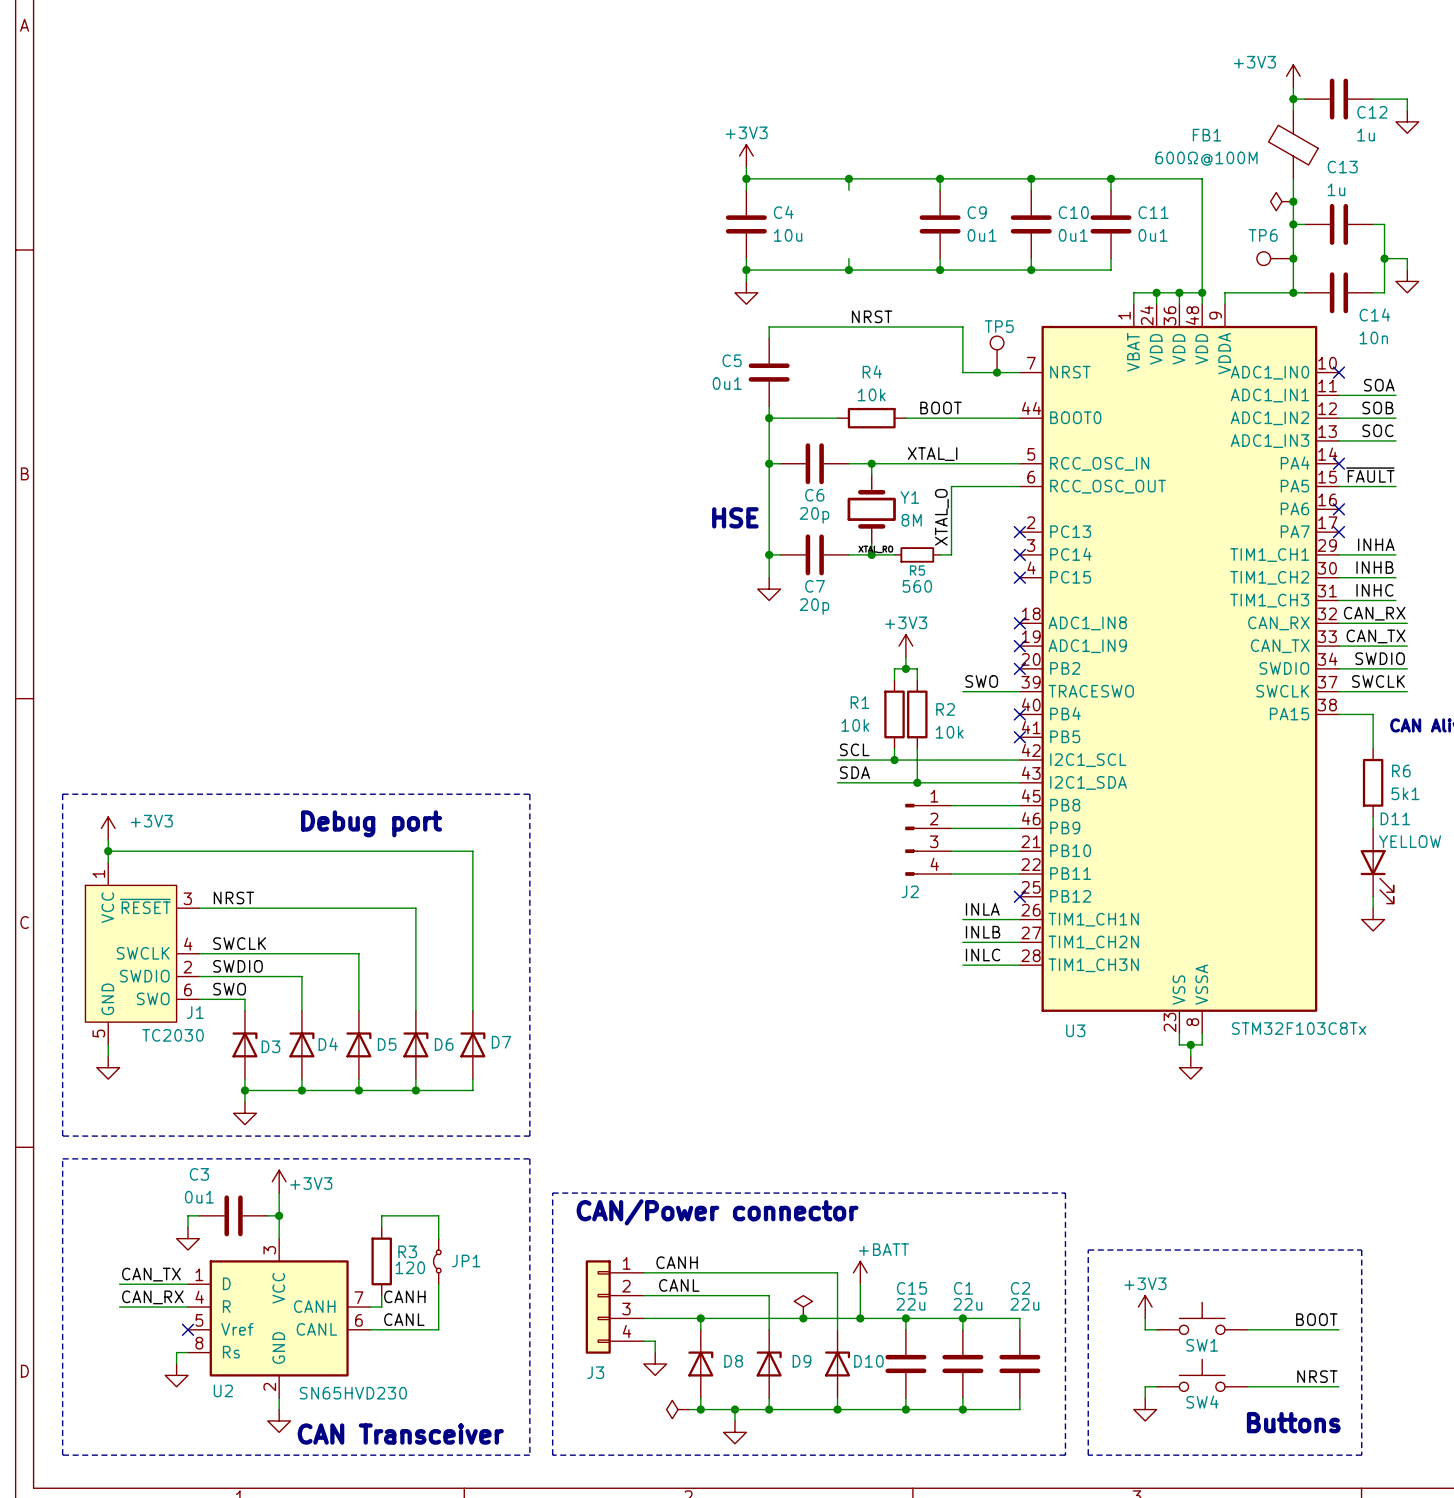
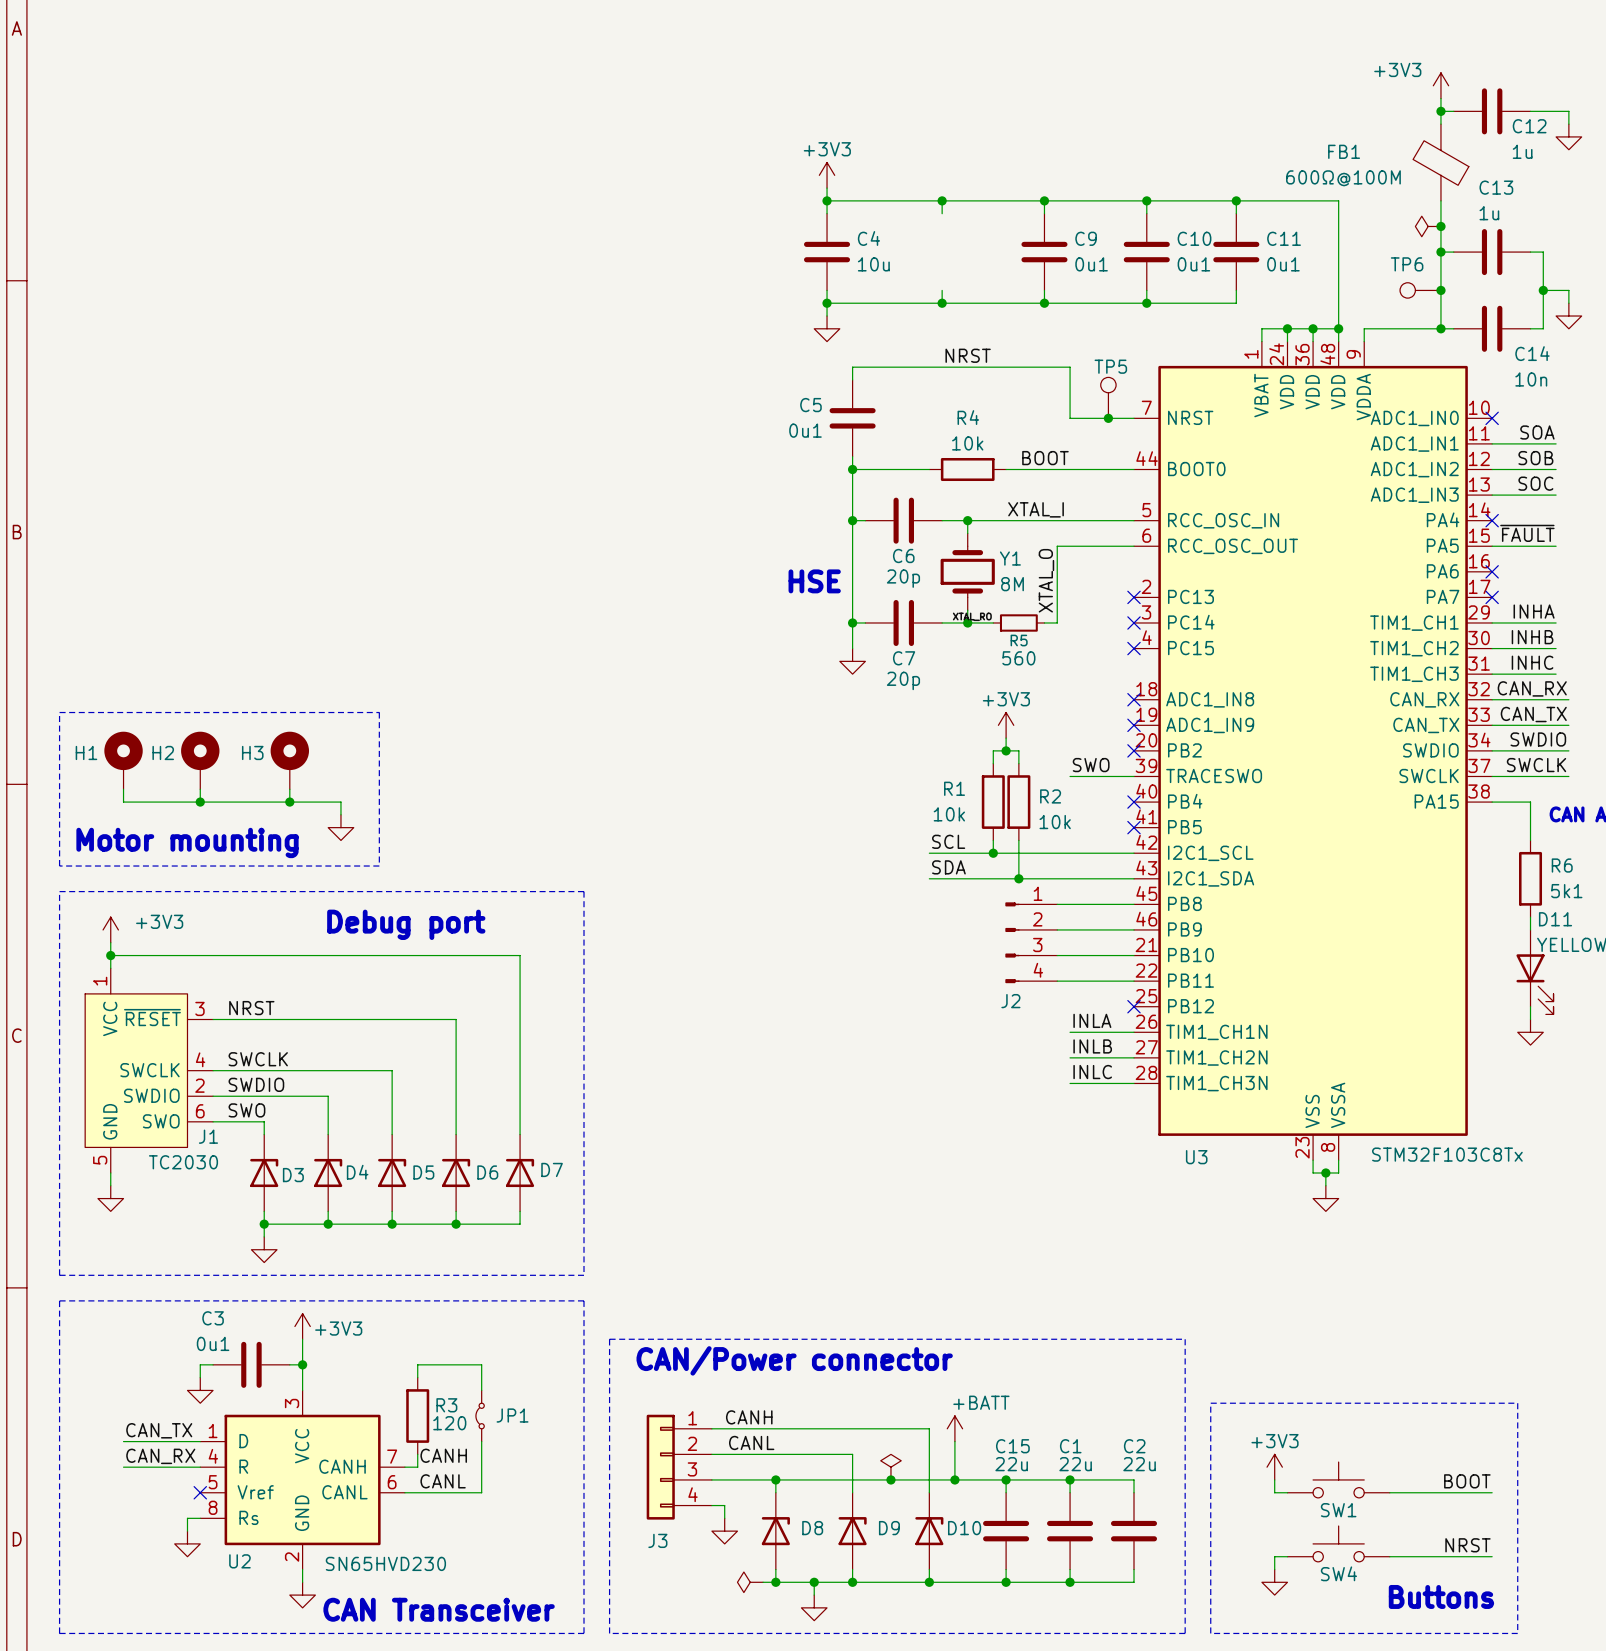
line: none -> (59, 712) (379, 712) (379, 866) (59, 866) (59, 712)
H1: none -> (123, 760)
H2: none -> (200, 760)
H3: none -> (289, 760)
wire: none -> (123, 789) (123, 802) (340, 802) (340, 814)
wire: none -> (200, 789) (200, 802)
wire: none -> (289, 789) (289, 802)
junction: none -> (200, 802)
junction: none -> (289, 802)
power symbol: none -> (340, 827)
text: none -> Motor mounting (187, 842)

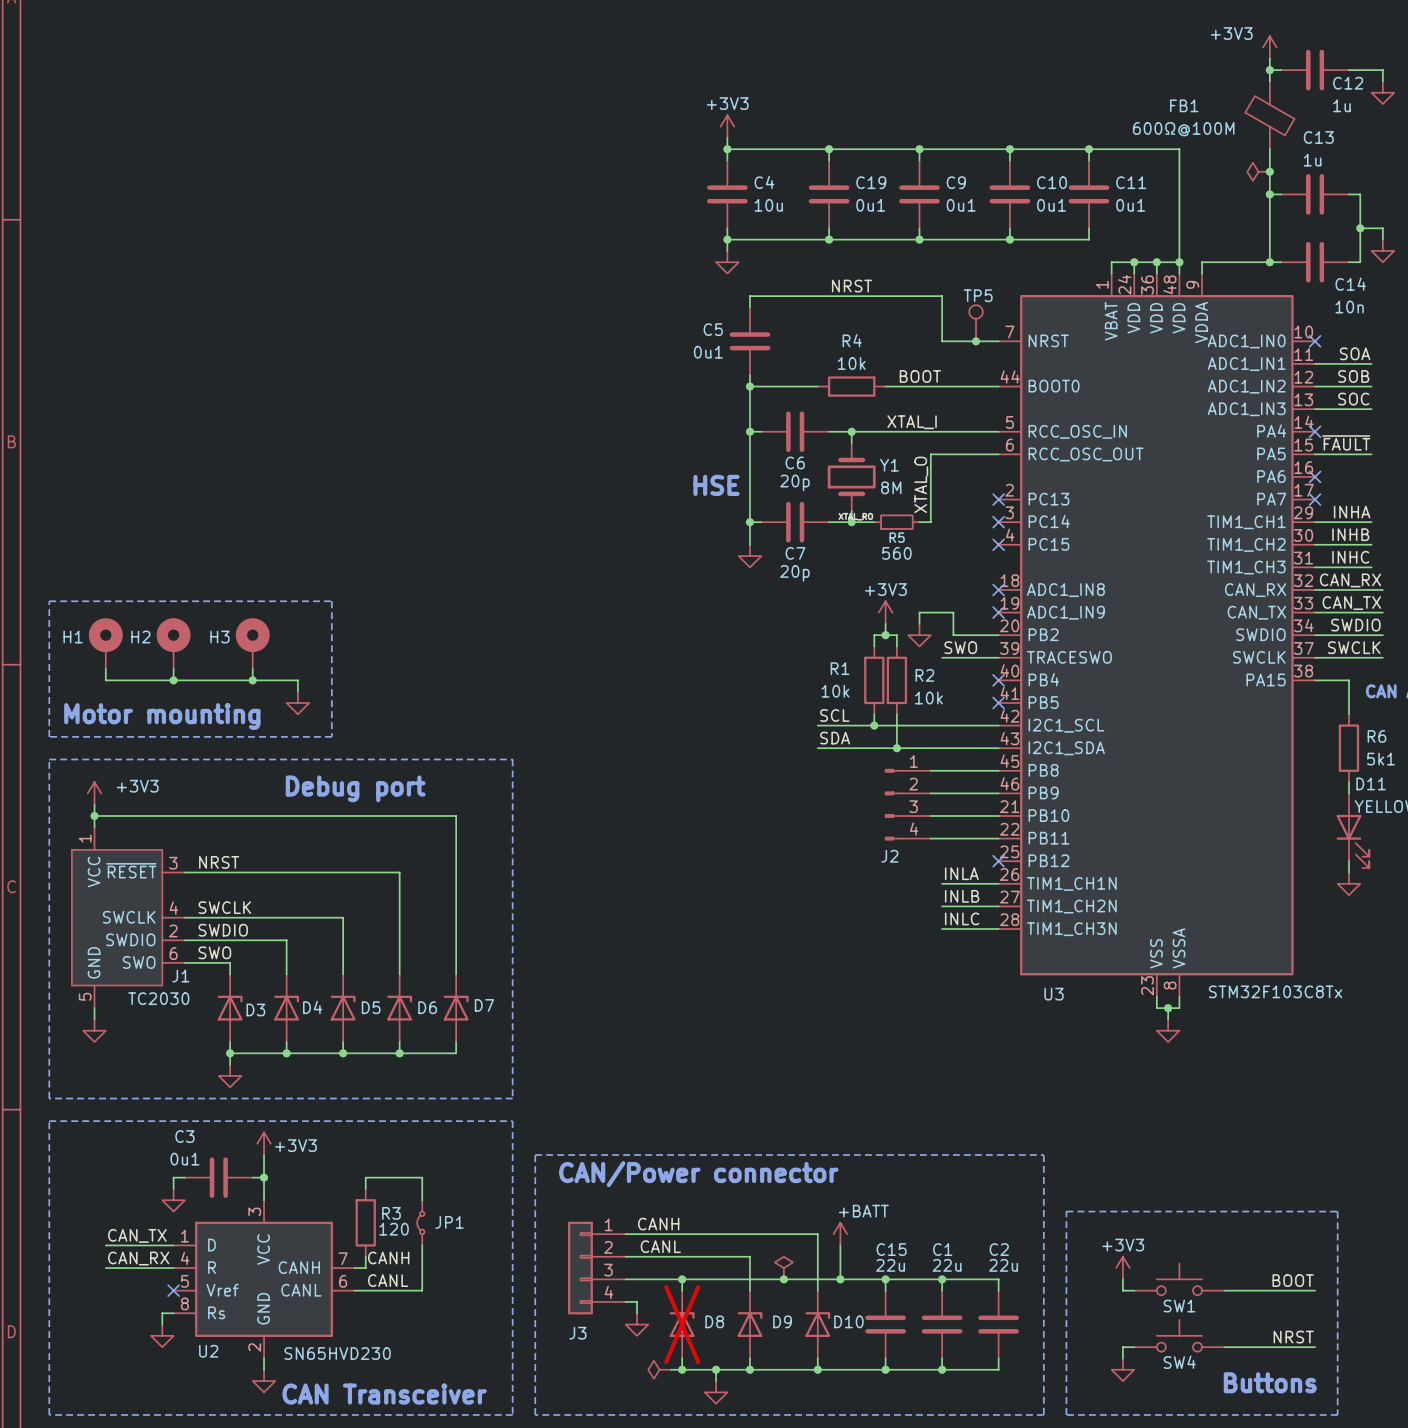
C19: none -> 0u1 (829, 194)
TP6: (1420, 290) -> none
junction: (1440, 290) -> none
wire: none -> (919, 623) (919, 612) (953, 612) (953, 635) (998, 635)
power symbol: none -> (919, 635)
no-connect mark: (1134, 750) -> none
D8 do-not-place cross: none -> (682, 1324)

